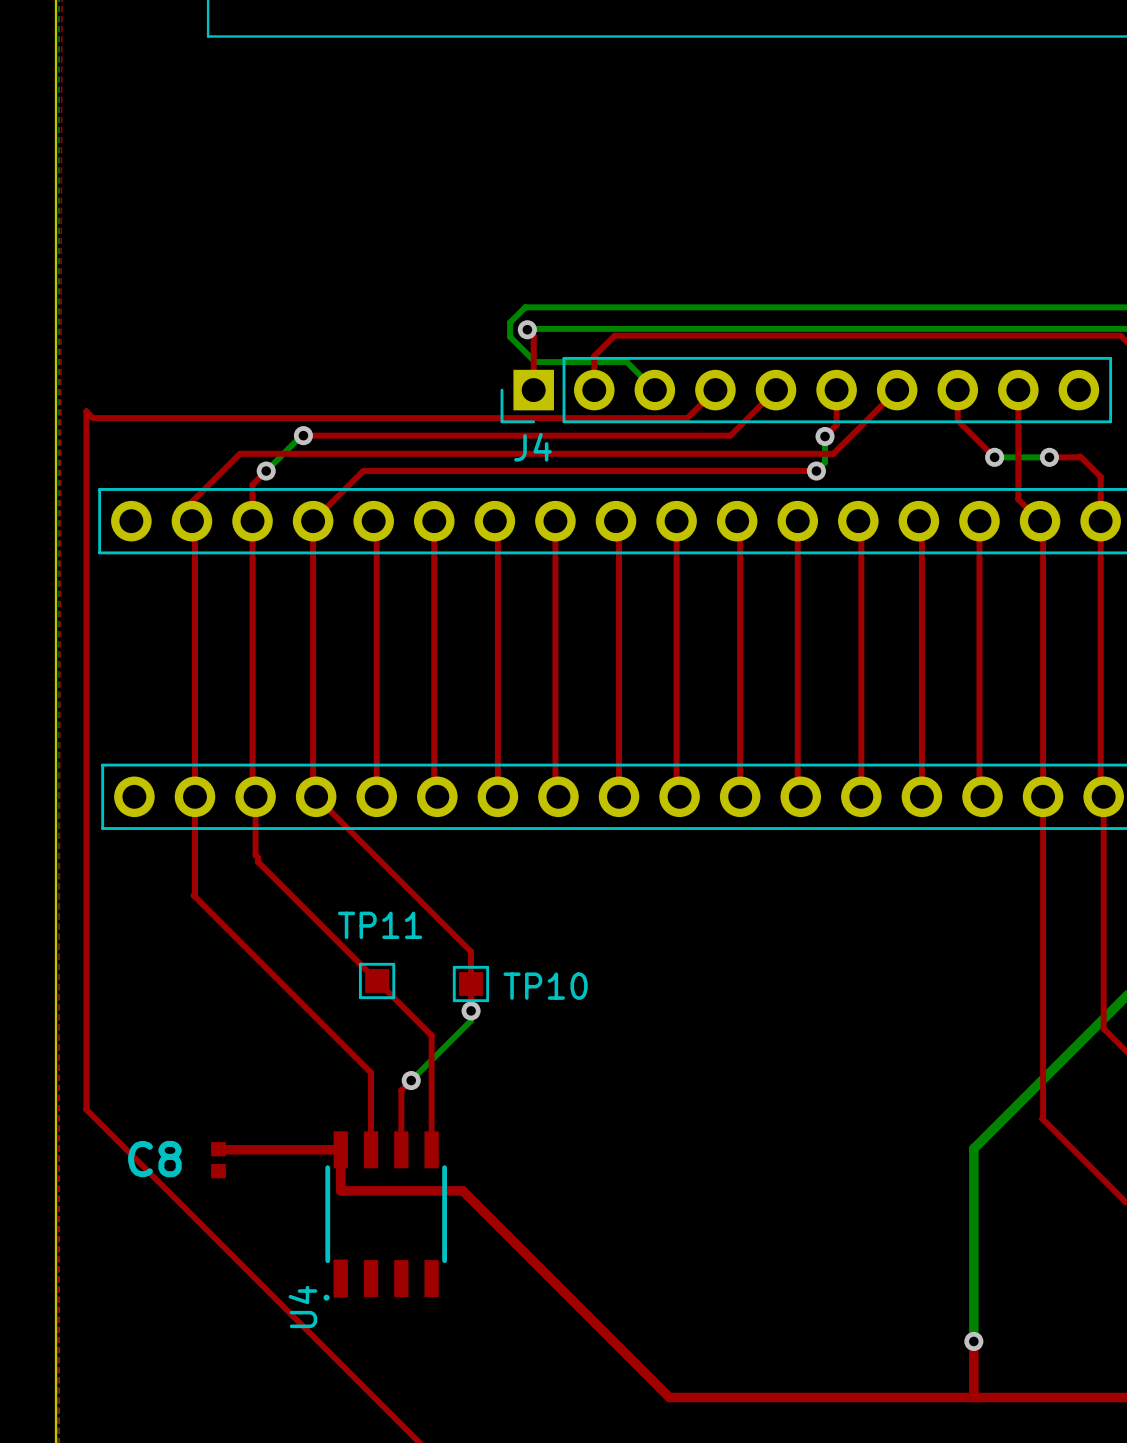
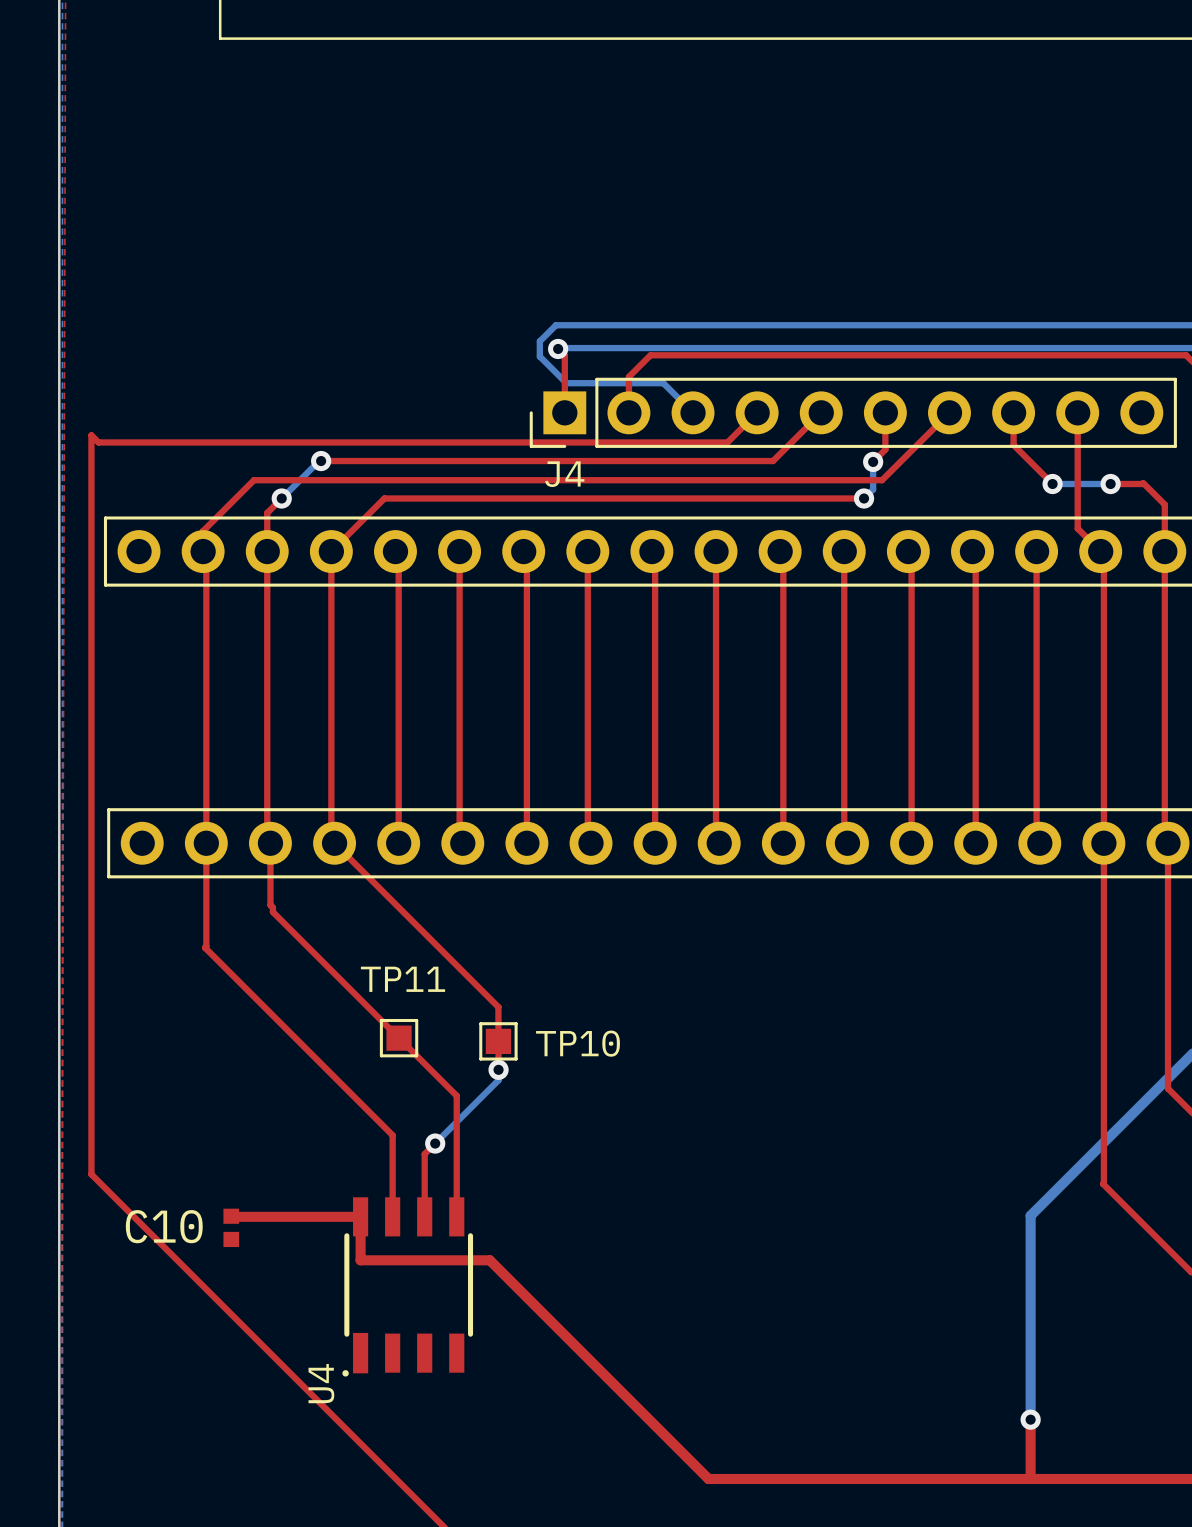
C8 name: C8 (154, 1159) -> C10 (164, 1226)

